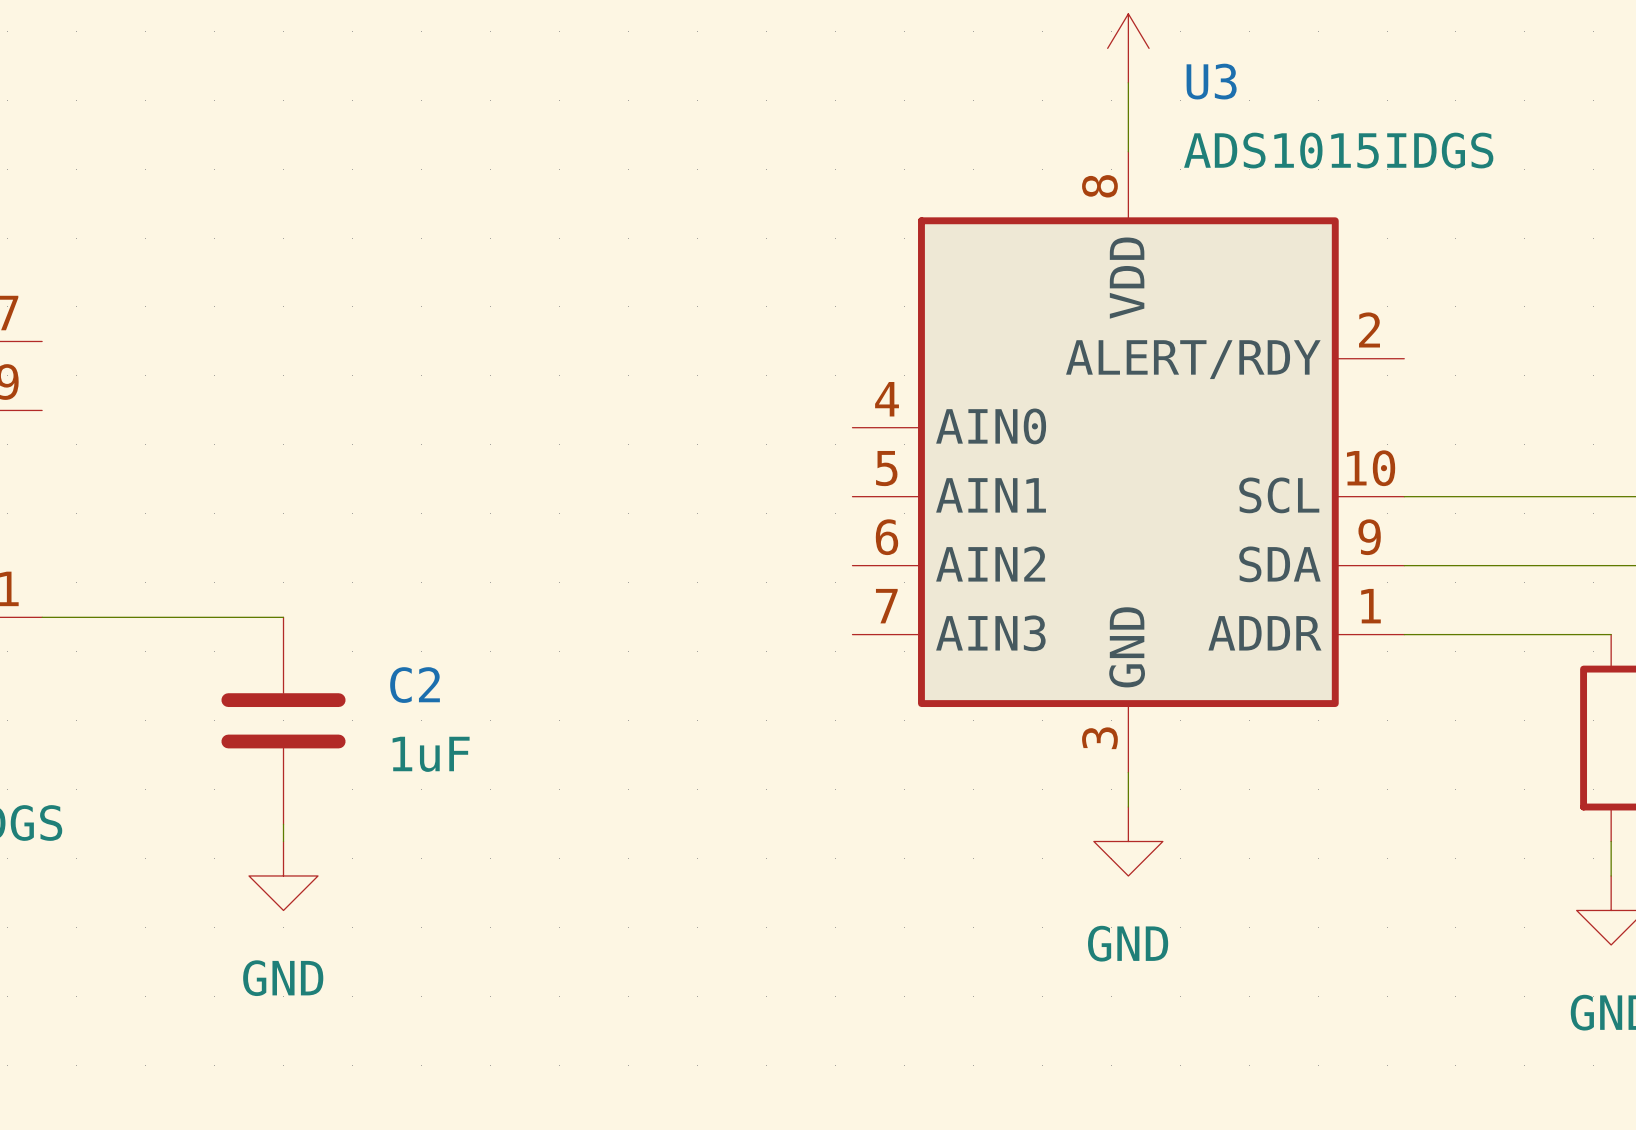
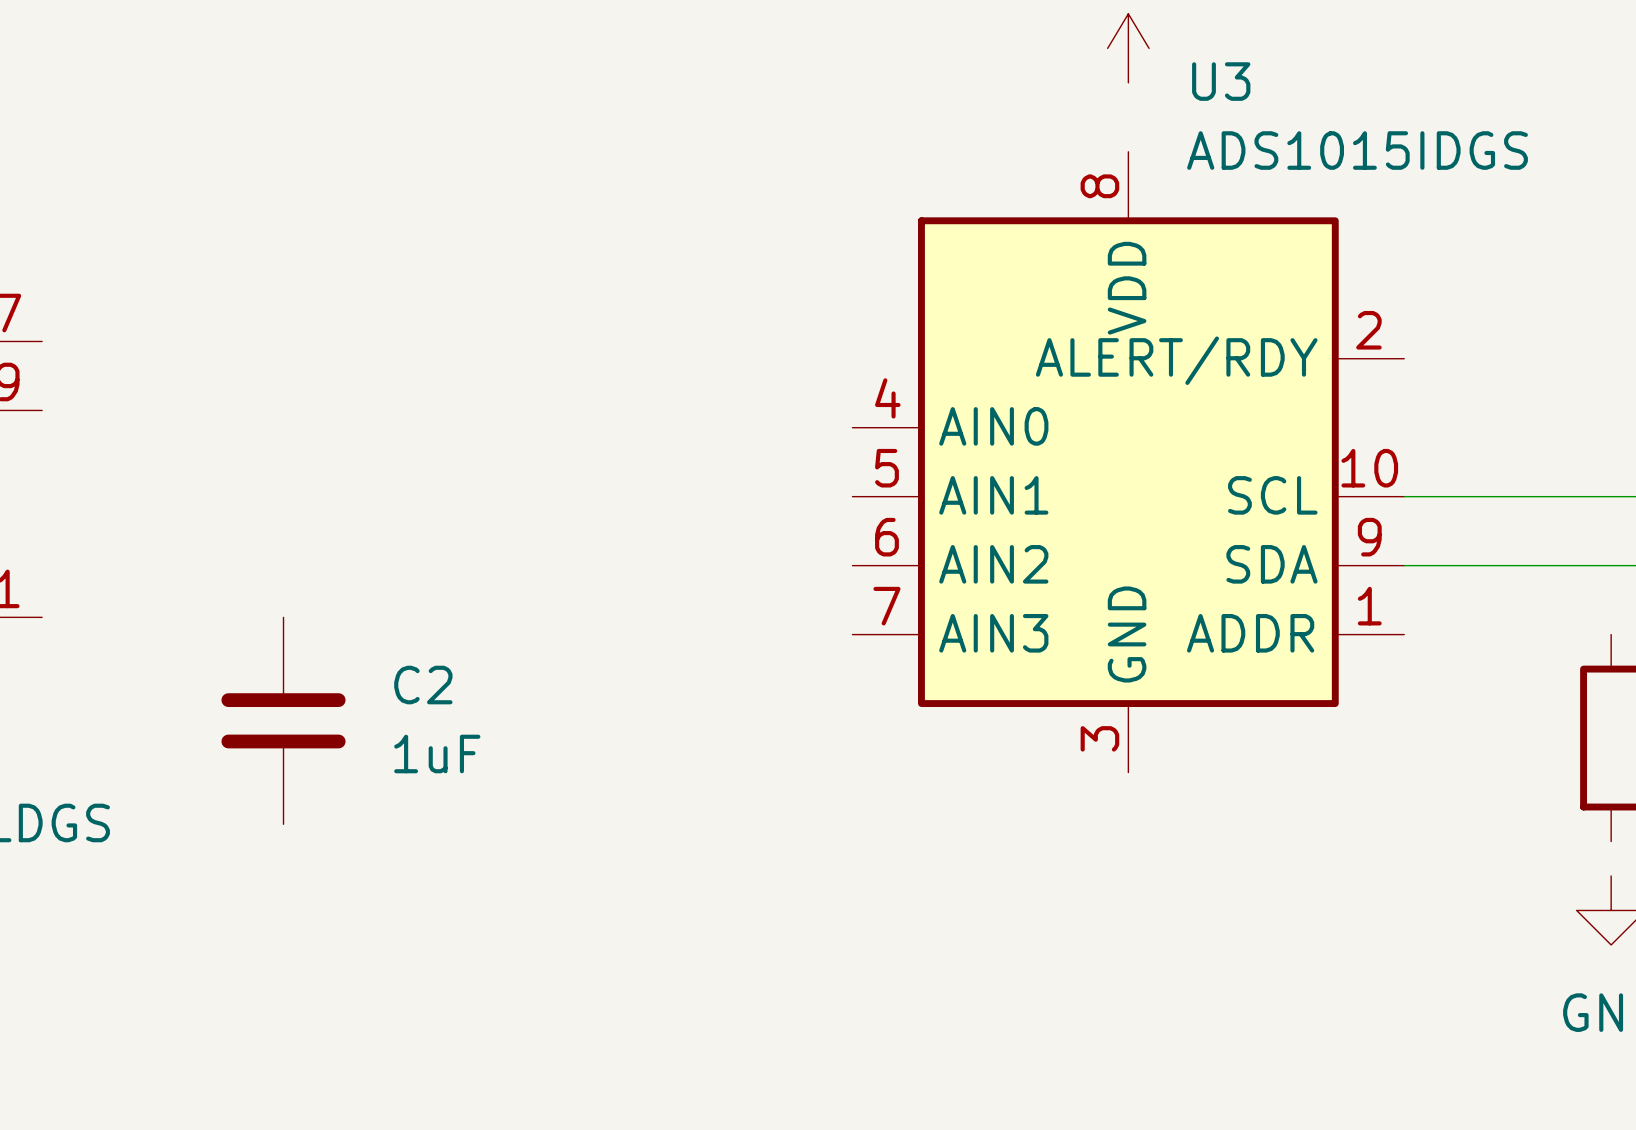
wire: (1128, 82) (1128, 151) -> none
wire: (42, 617) (283, 617) -> none
wire: (1404, 634) (1611, 634) -> none
wire: (1128, 772) (1128, 807) -> none
wire: (283, 824) (283, 841) -> none
power symbol: GND (1128, 841) -> none
wire: (1611, 841) (1611, 875) -> none
power symbol: GND (283, 875) -> none

